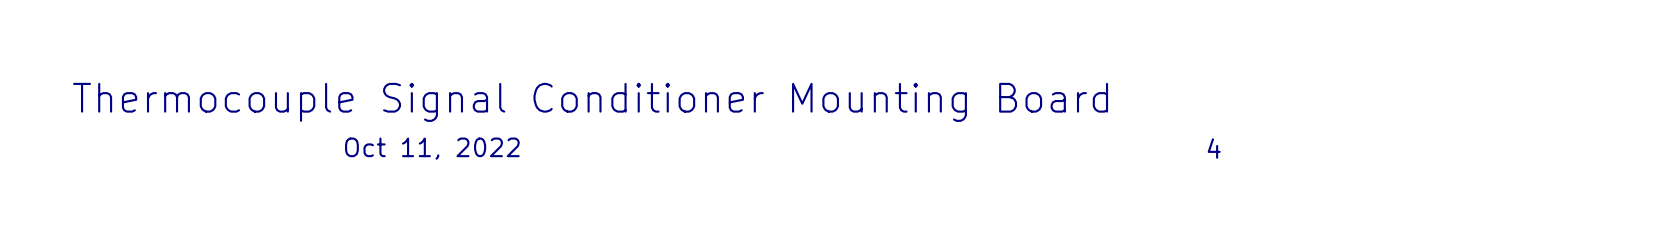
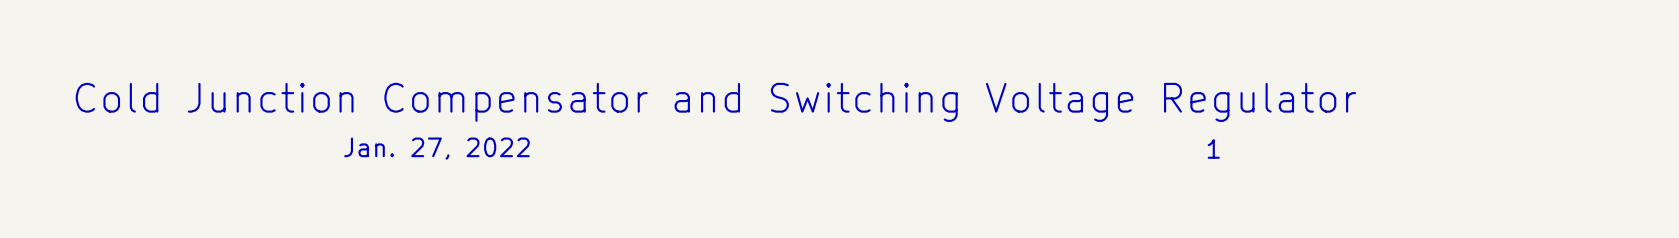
text: Thermocouple Signal Conditioner Mounting Board (590, 102) -> Cold Junction Compensator and Switching Voltage Regulator (715, 102)
text: Oct 11, 2022 (432, 148) -> Jan. 27, 2022 (436, 148)
text: 4 (1214, 148) -> 1 (1213, 148)

